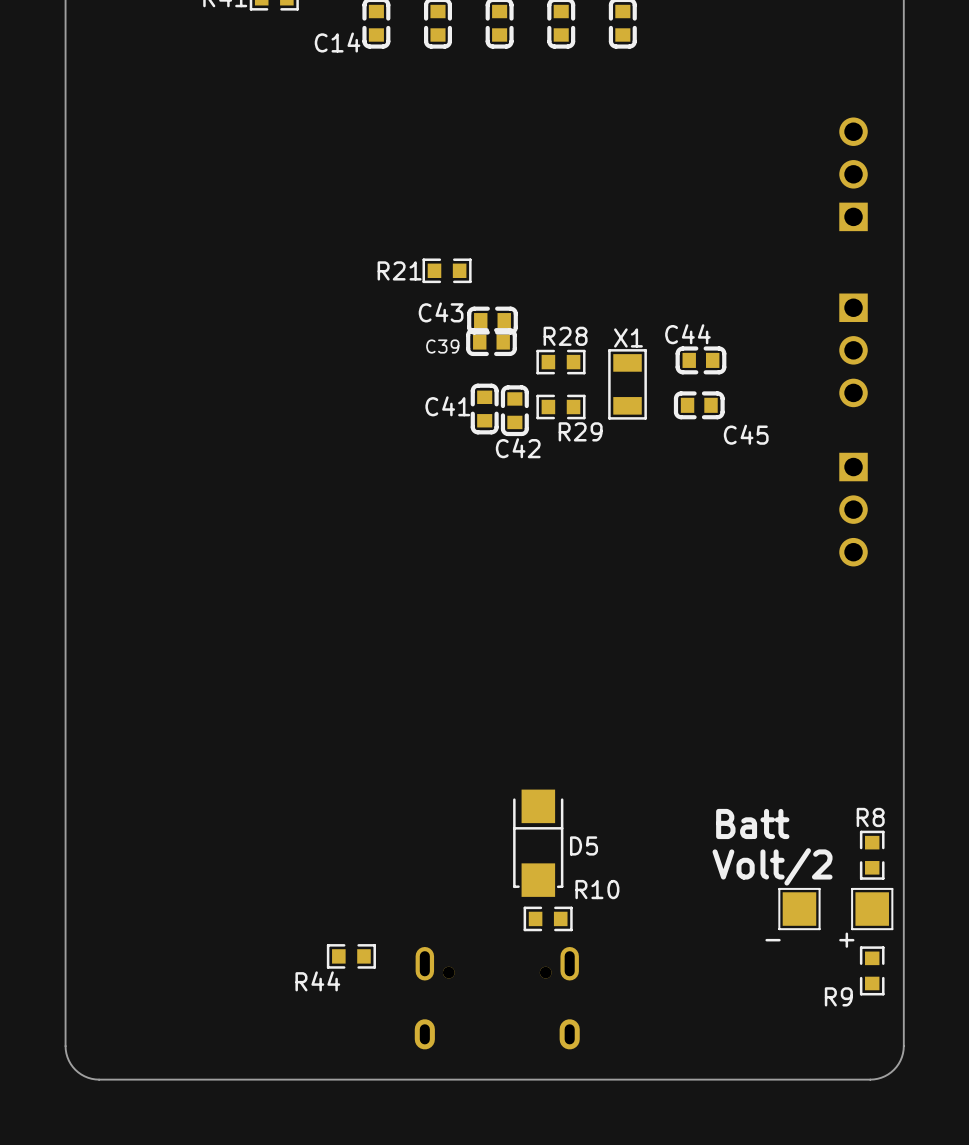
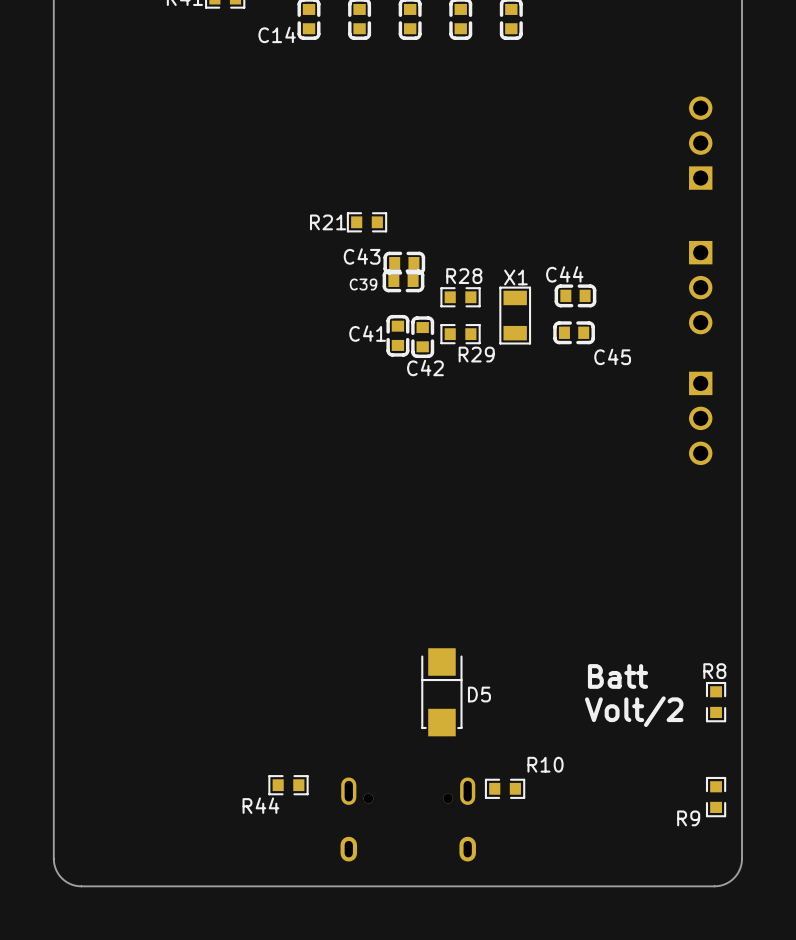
part: (799, 909) -> none
part: (872, 909) -> none
R10 position: (548, 918) -> (505, 788)

